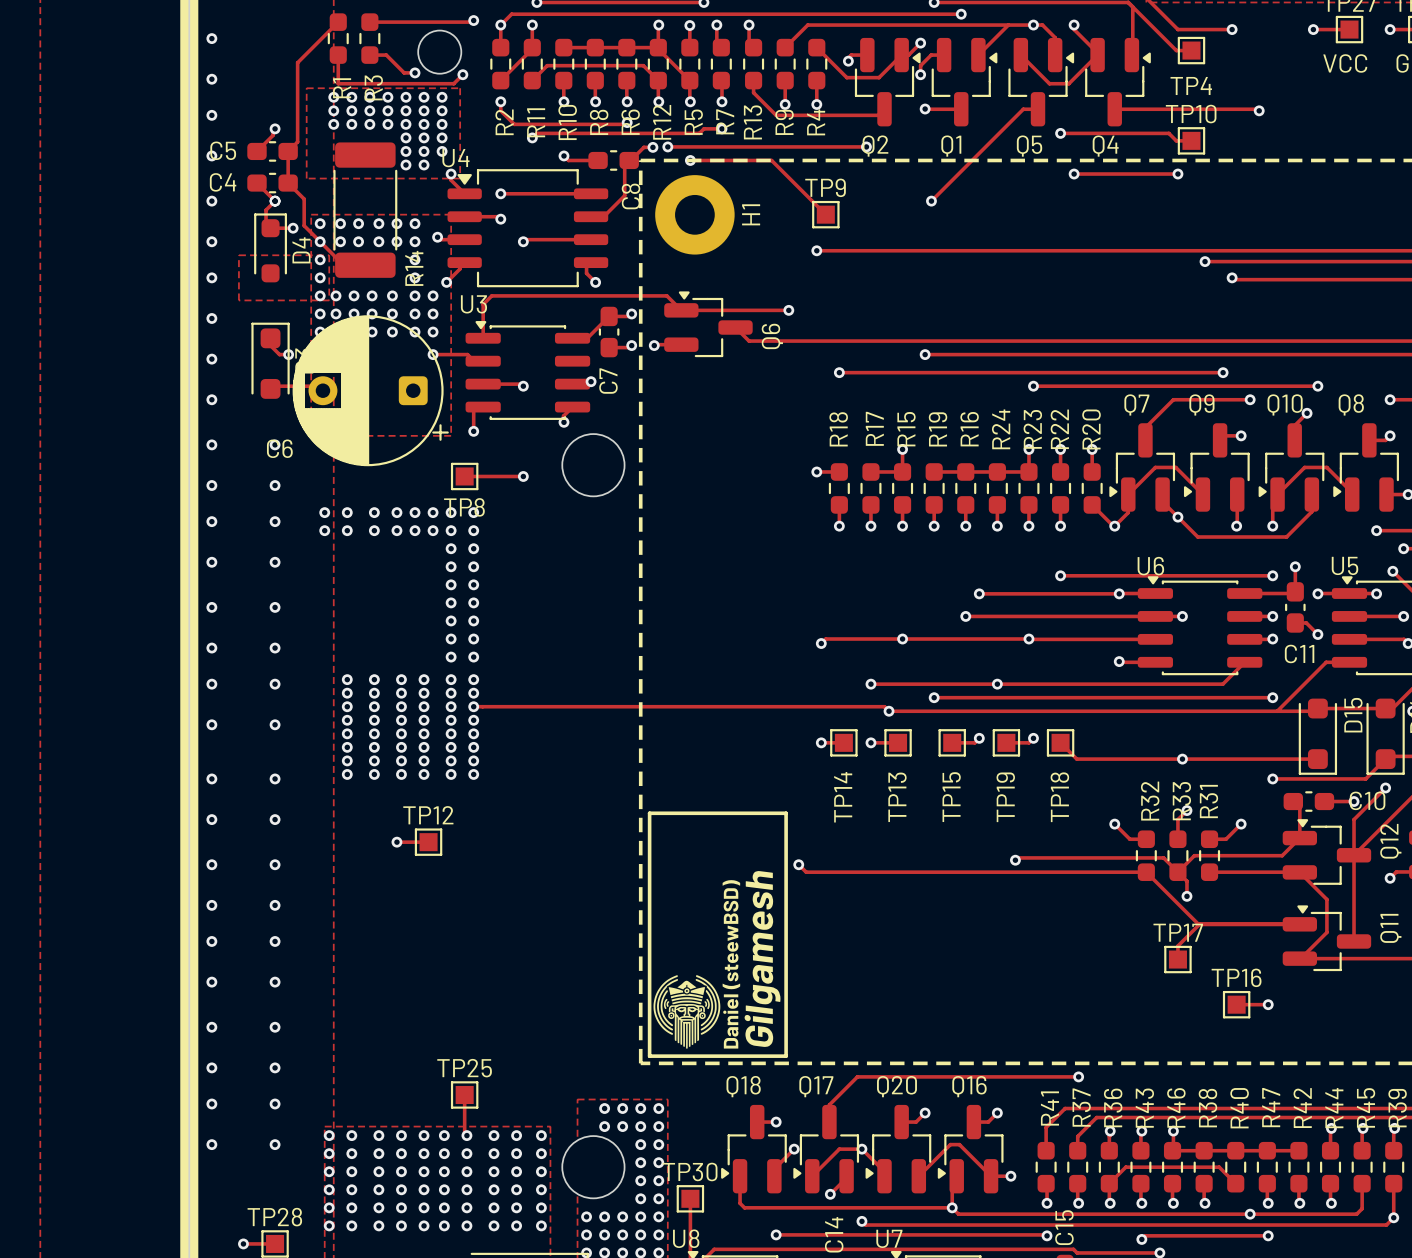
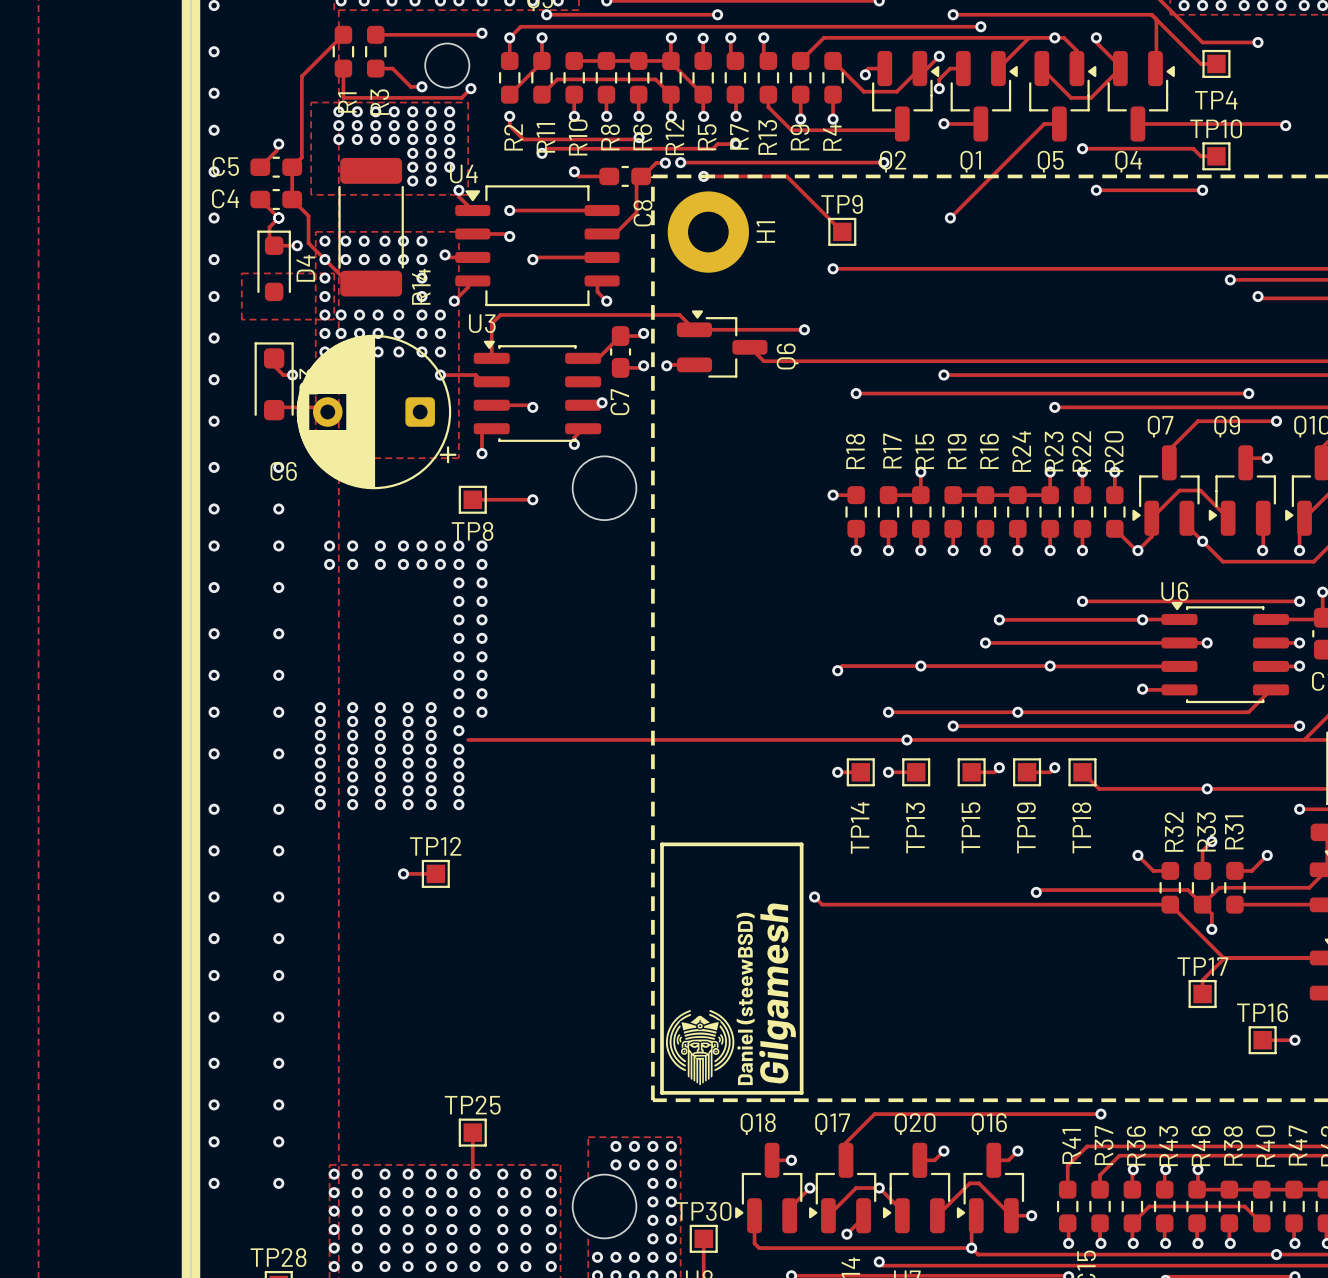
via: (324, 512) -> none
via: (347, 512) -> none
via: (374, 512) -> none
via: (396, 512) -> none
via: (415, 512) -> none
via: (433, 512) -> none
via: (451, 512) -> none
via: (473, 512) -> none
via: none -> (329, 545)
via: none -> (352, 545)
via: none -> (380, 545)
via: none -> (403, 545)
via: none -> (421, 545)
via: none -> (440, 545)
via: none -> (458, 545)
via: none -> (482, 545)
via: (324, 530) -> none
via: (347, 530) -> none
via: (374, 530) -> none
via: (396, 530) -> none
via: (415, 530) -> none
via: (433, 530) -> none
via: (451, 530) -> none
via: (473, 530) -> none
via: none -> (329, 564)
via: none -> (352, 564)
via: none -> (380, 564)
via: none -> (403, 564)
via: none -> (421, 564)
via: none -> (440, 564)
via: none -> (458, 564)
via: none -> (482, 564)
via: (451, 548) -> none
via: (473, 548) -> none
via: none -> (458, 582)
via: none -> (482, 582)
via: (451, 566) -> none
via: (473, 566) -> none
via: none -> (458, 601)
via: none -> (482, 601)
via: (451, 584) -> none
via: (473, 584) -> none
via: none -> (458, 619)
via: none -> (482, 619)
via: (451, 602) -> none
via: (473, 602) -> none
via: none -> (458, 638)
via: none -> (482, 638)
via: (451, 620) -> none
via: (473, 620) -> none
via: none -> (458, 656)
via: none -> (482, 656)
via: (451, 639) -> none
via: (473, 639) -> none
via: none -> (458, 675)
via: none -> (482, 675)
via: (451, 657) -> none
via: (473, 657) -> none
via: none -> (458, 693)
via: none -> (482, 693)
via: none -> (320, 707)
via: (451, 679) -> none
via: (473, 679) -> none
via: none -> (458, 712)
via: none -> (482, 712)
via: none -> (320, 721)
via: (451, 693) -> none
via: (473, 693) -> none
via: none -> (458, 730)
via: none -> (320, 735)
via: (451, 706) -> none
track: (473, 706) (884, 706) (889, 711) -> (468, 739) (906, 739)
via: (473, 706) -> none
via: none -> (320, 749)
via: (473, 720) -> none
via: none -> (320, 763)
via: (473, 733) -> none
via: none -> (320, 776)
via: (473, 747) -> none
via: none -> (320, 790)
via: (473, 760) -> none
via: none -> (320, 804)
via: (473, 774) -> none

